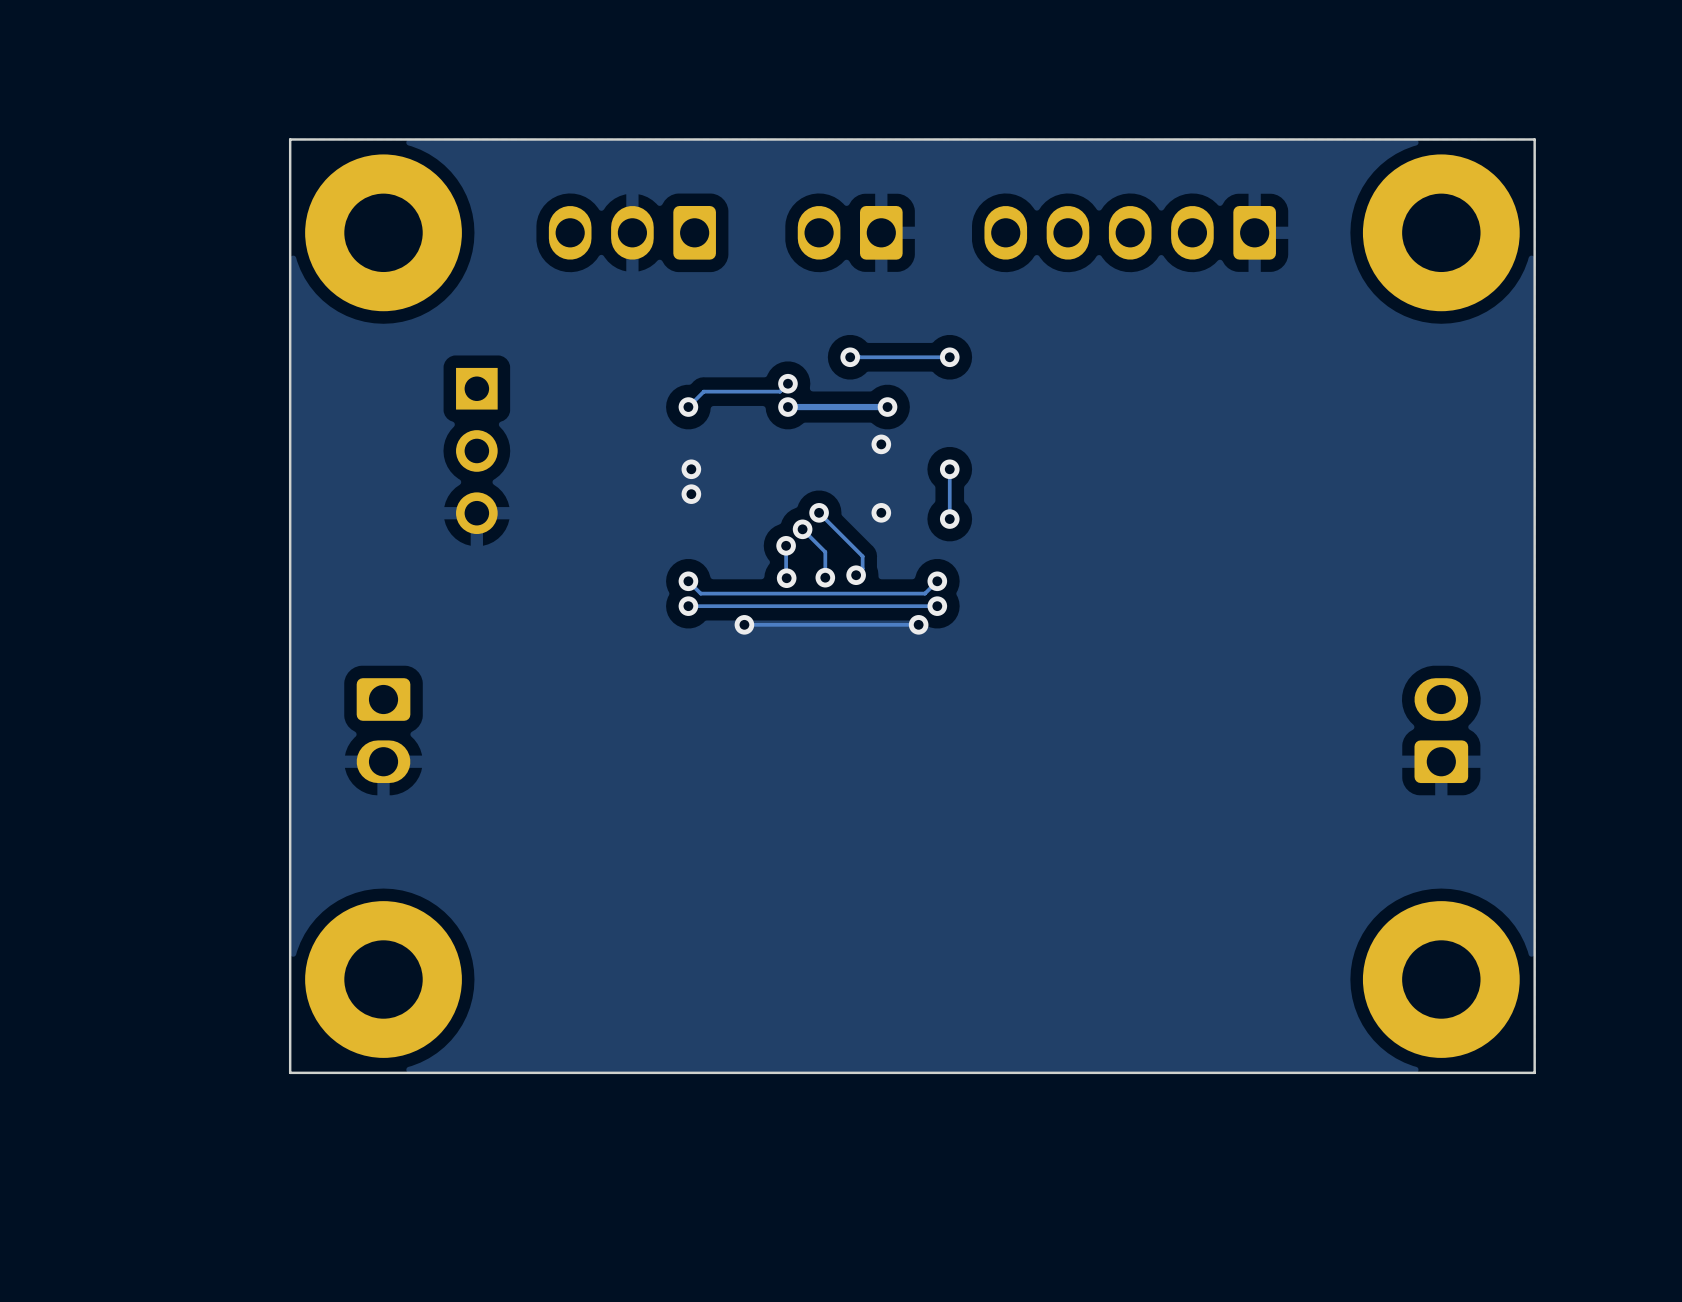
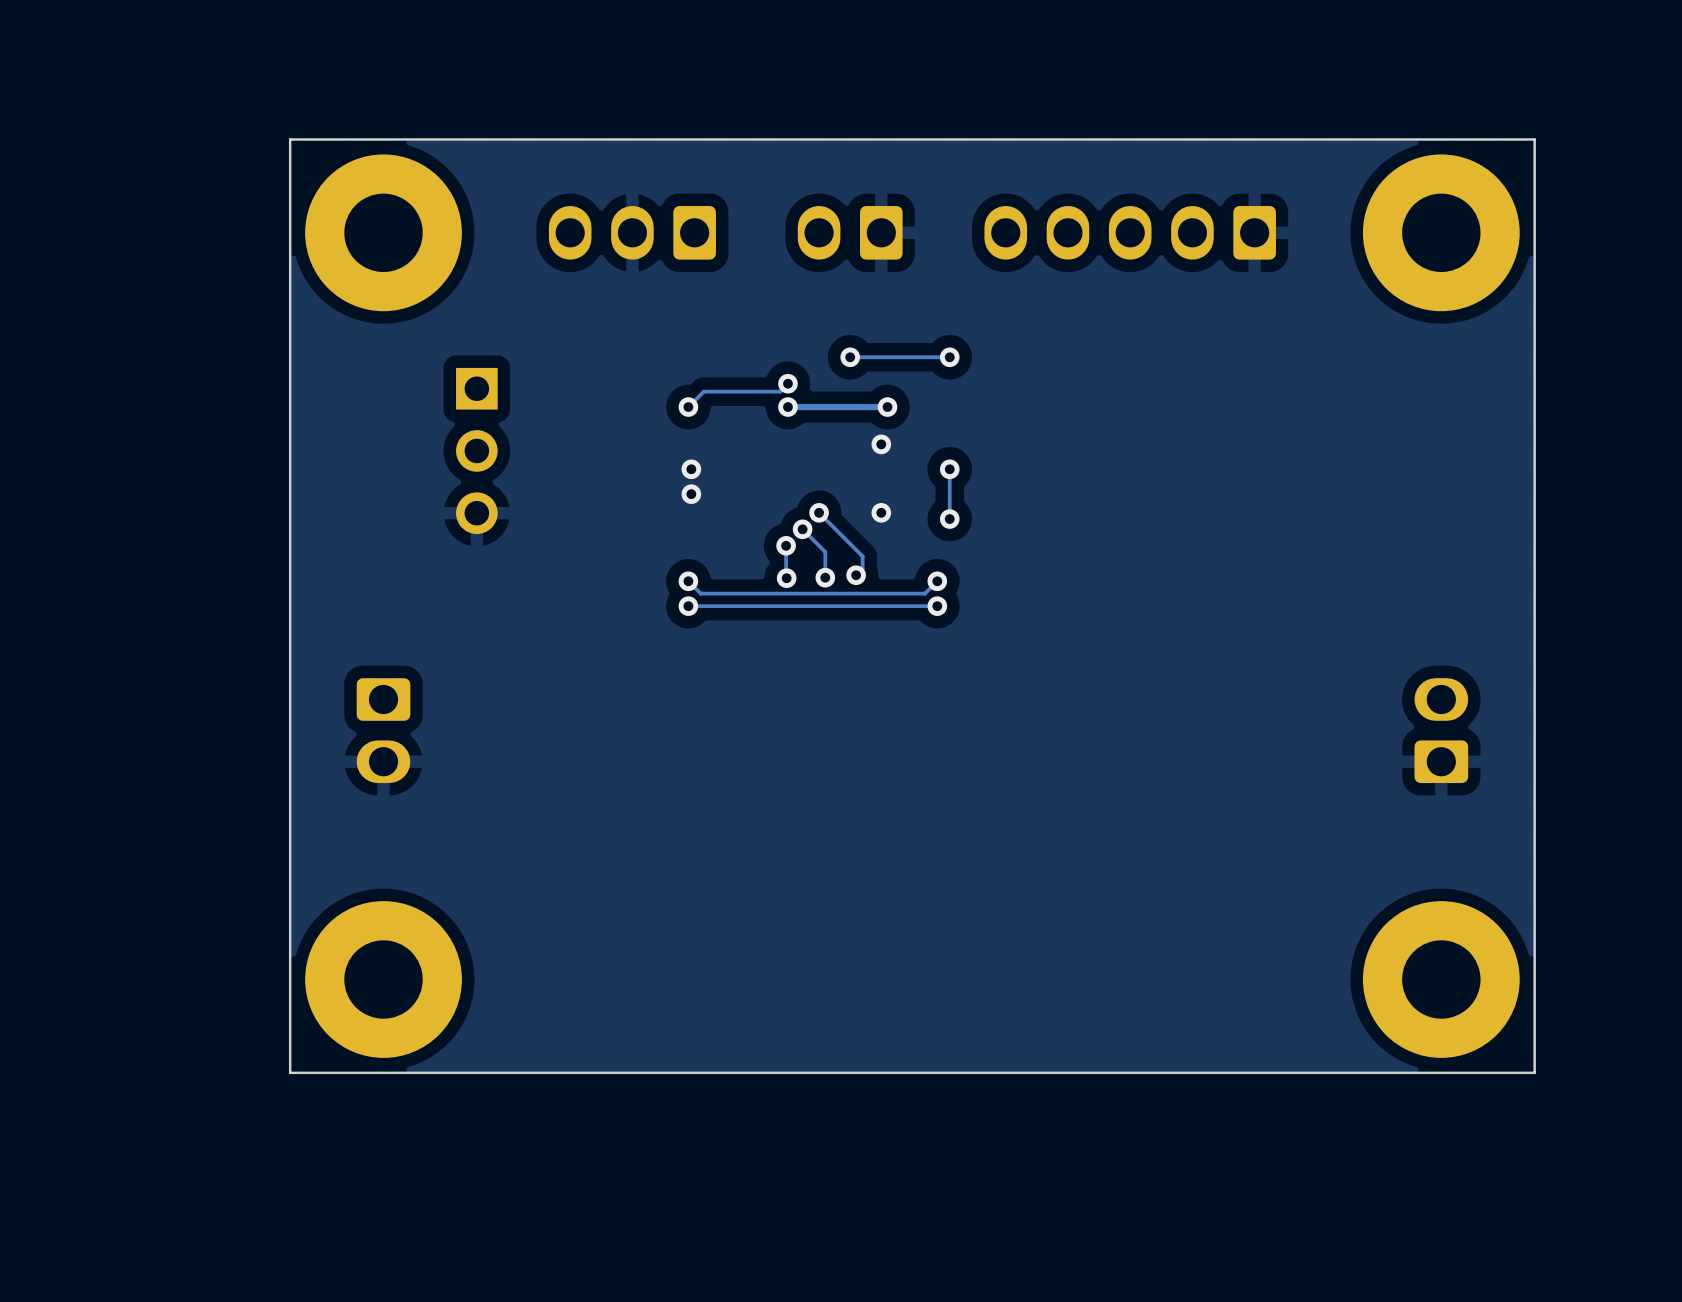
via: (744, 624) -> none
track: (918, 624) (744, 624) -> none
via: (918, 624) -> none

